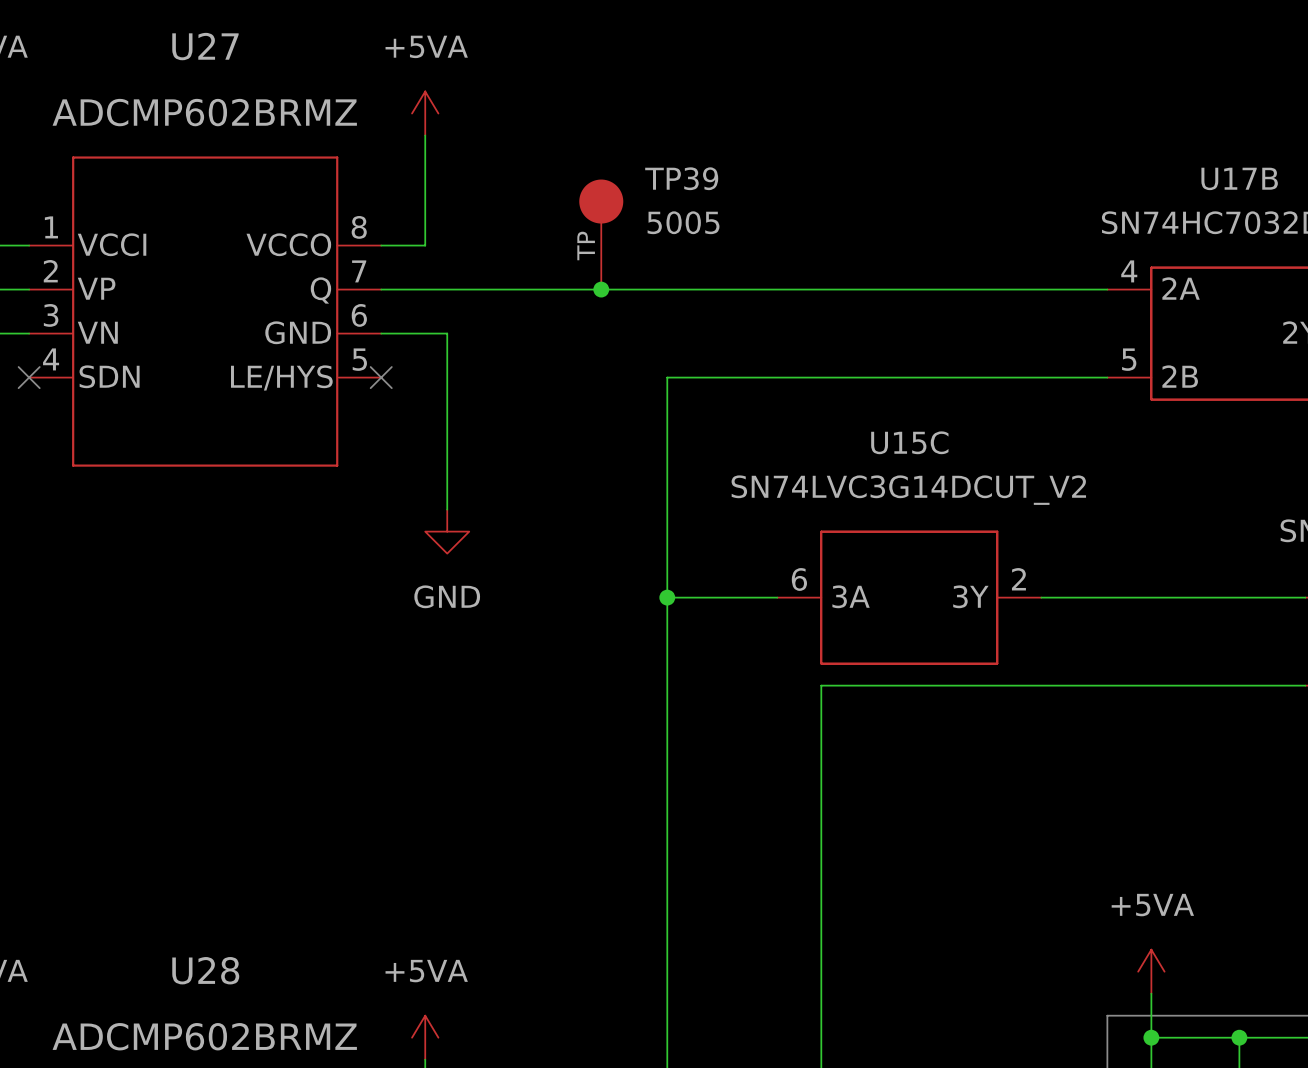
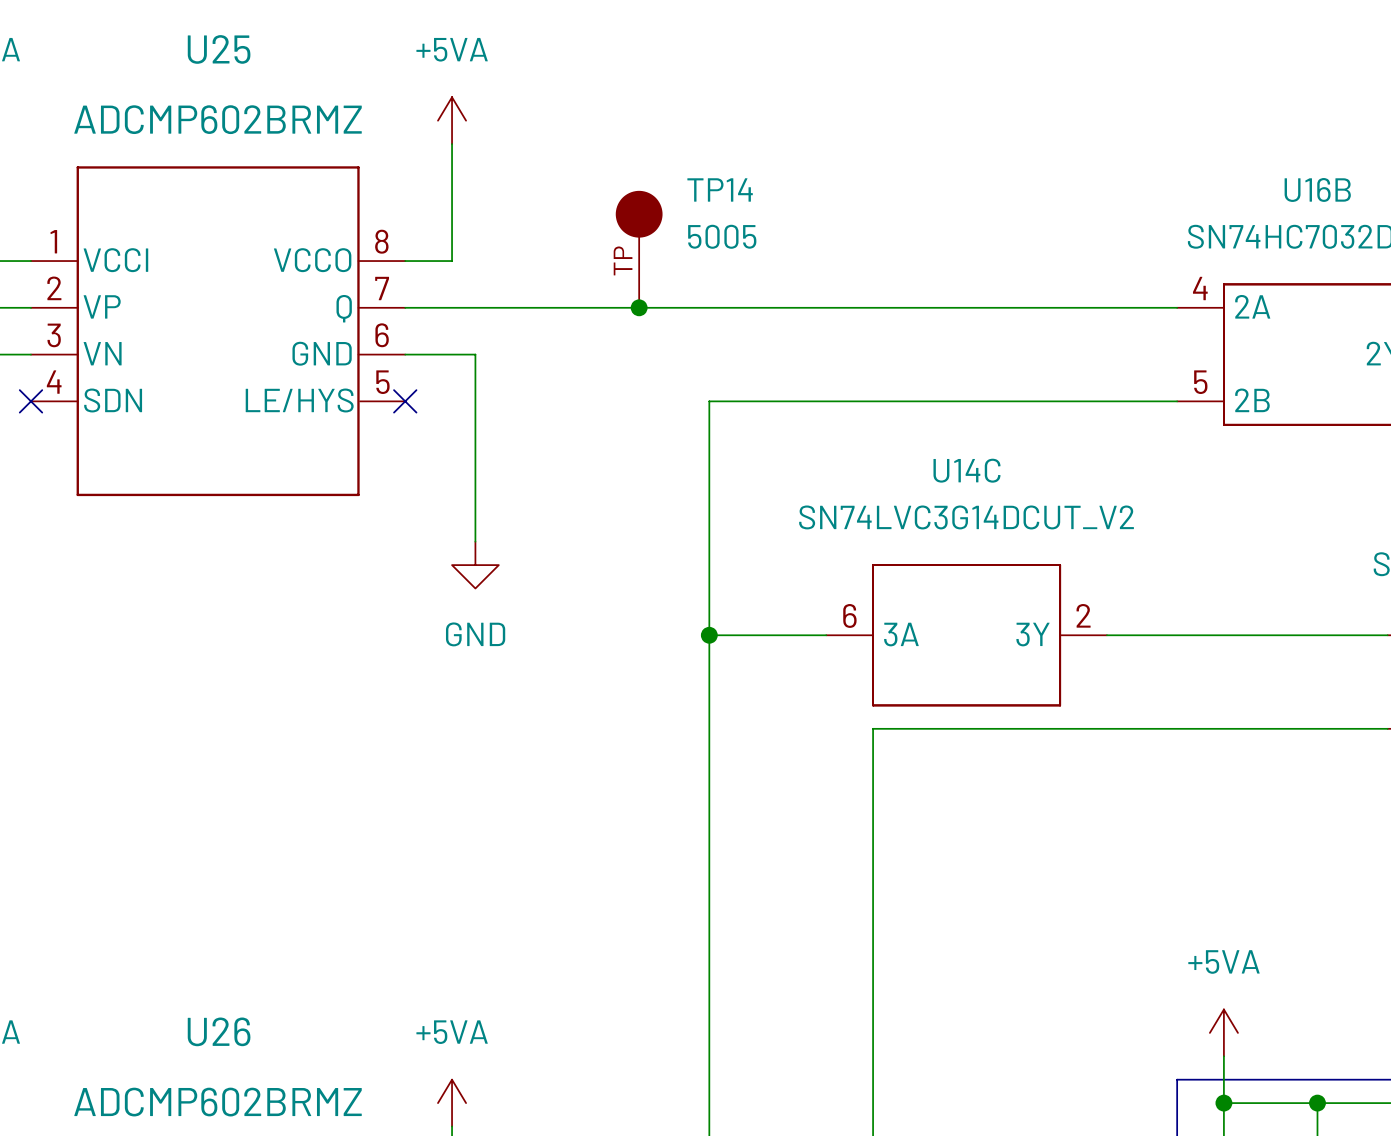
U27 name: U27 (205, 46) -> U25 (219, 49)
TP39 name: TP39 (681, 178) -> TP14 (720, 189)
U17B name: U17B (1239, 178) -> U16B (1317, 189)
U15C name: U15C (909, 442) -> U14C (966, 470)
U28 name: U28 (205, 970) -> U26 (219, 1031)

